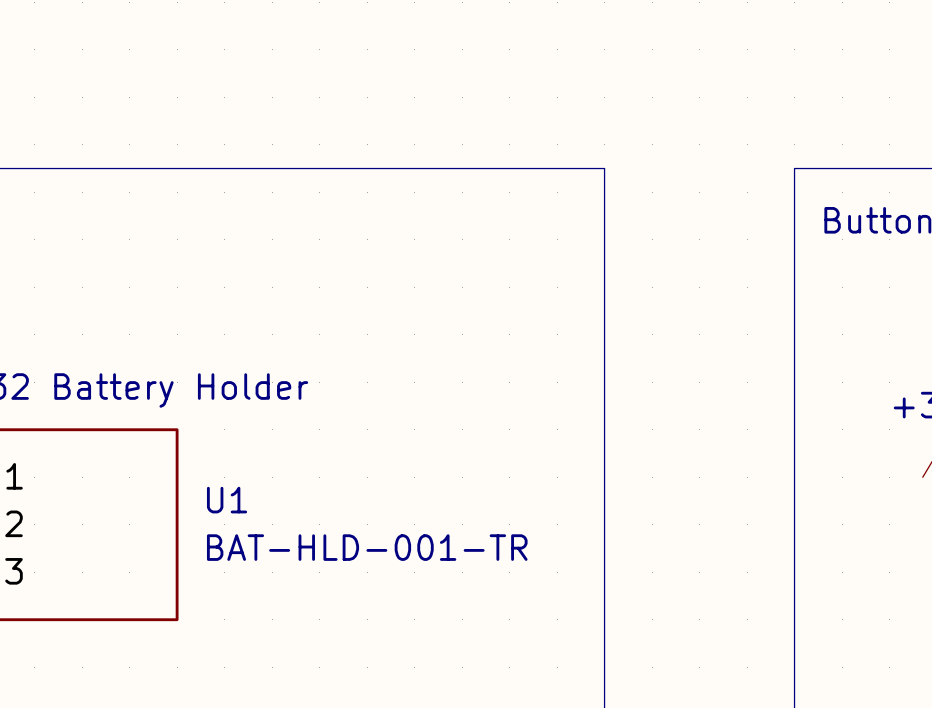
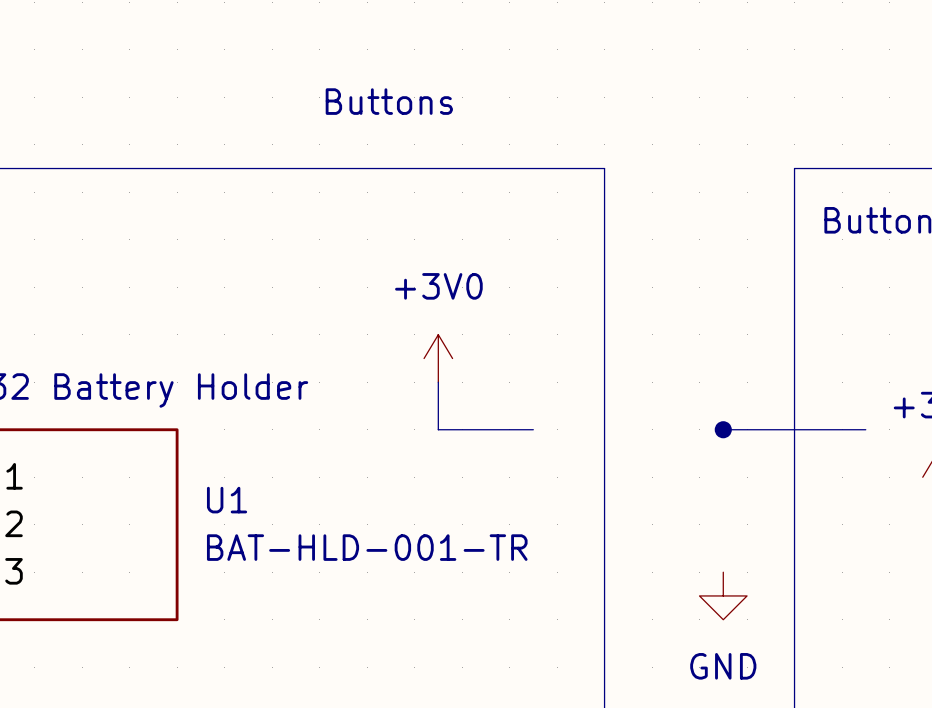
text: none -> Buttons (389, 101)
power symbol: none -> +3V0 (438, 358)
wire: none -> (438, 382) (438, 429) (533, 429)
wire: none -> (723, 429) (865, 429)
junction: none -> (723, 429)
power symbol: none -> GND (723, 595)

